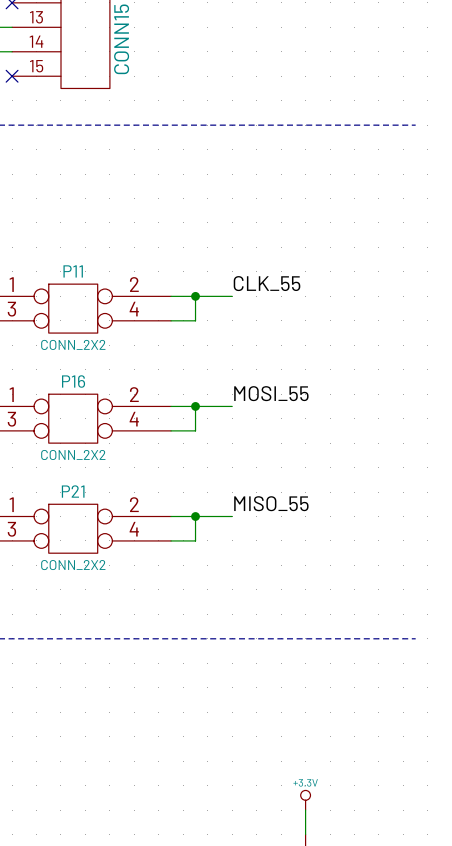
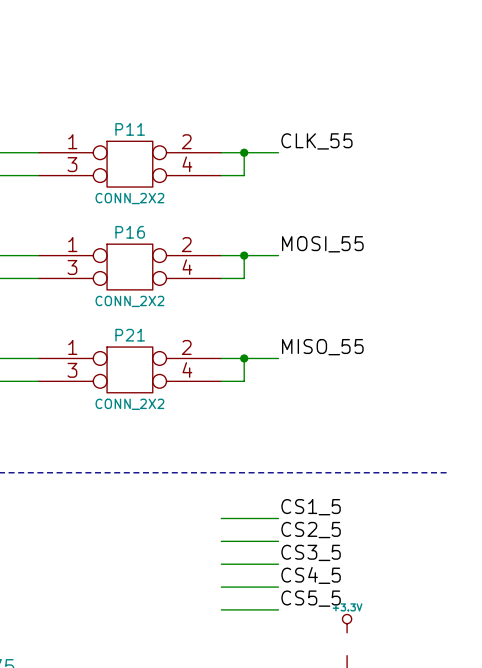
label: none -> CS1_5 (311, 507)
wire: none -> (221, 518) (278, 518)
label: none -> CS2_5 (311, 530)
wire: none -> (221, 541) (278, 541)
label: none -> CS3_5 (311, 552)
wire: none -> (221, 564) (278, 564)
label: none -> CS4_5 (311, 575)
wire: none -> (221, 587) (278, 587)
label: none -> CS5_5 (311, 598)
wire: none -> (221, 609) (278, 609)
wire: (305, 810) (305, 834) -> none

